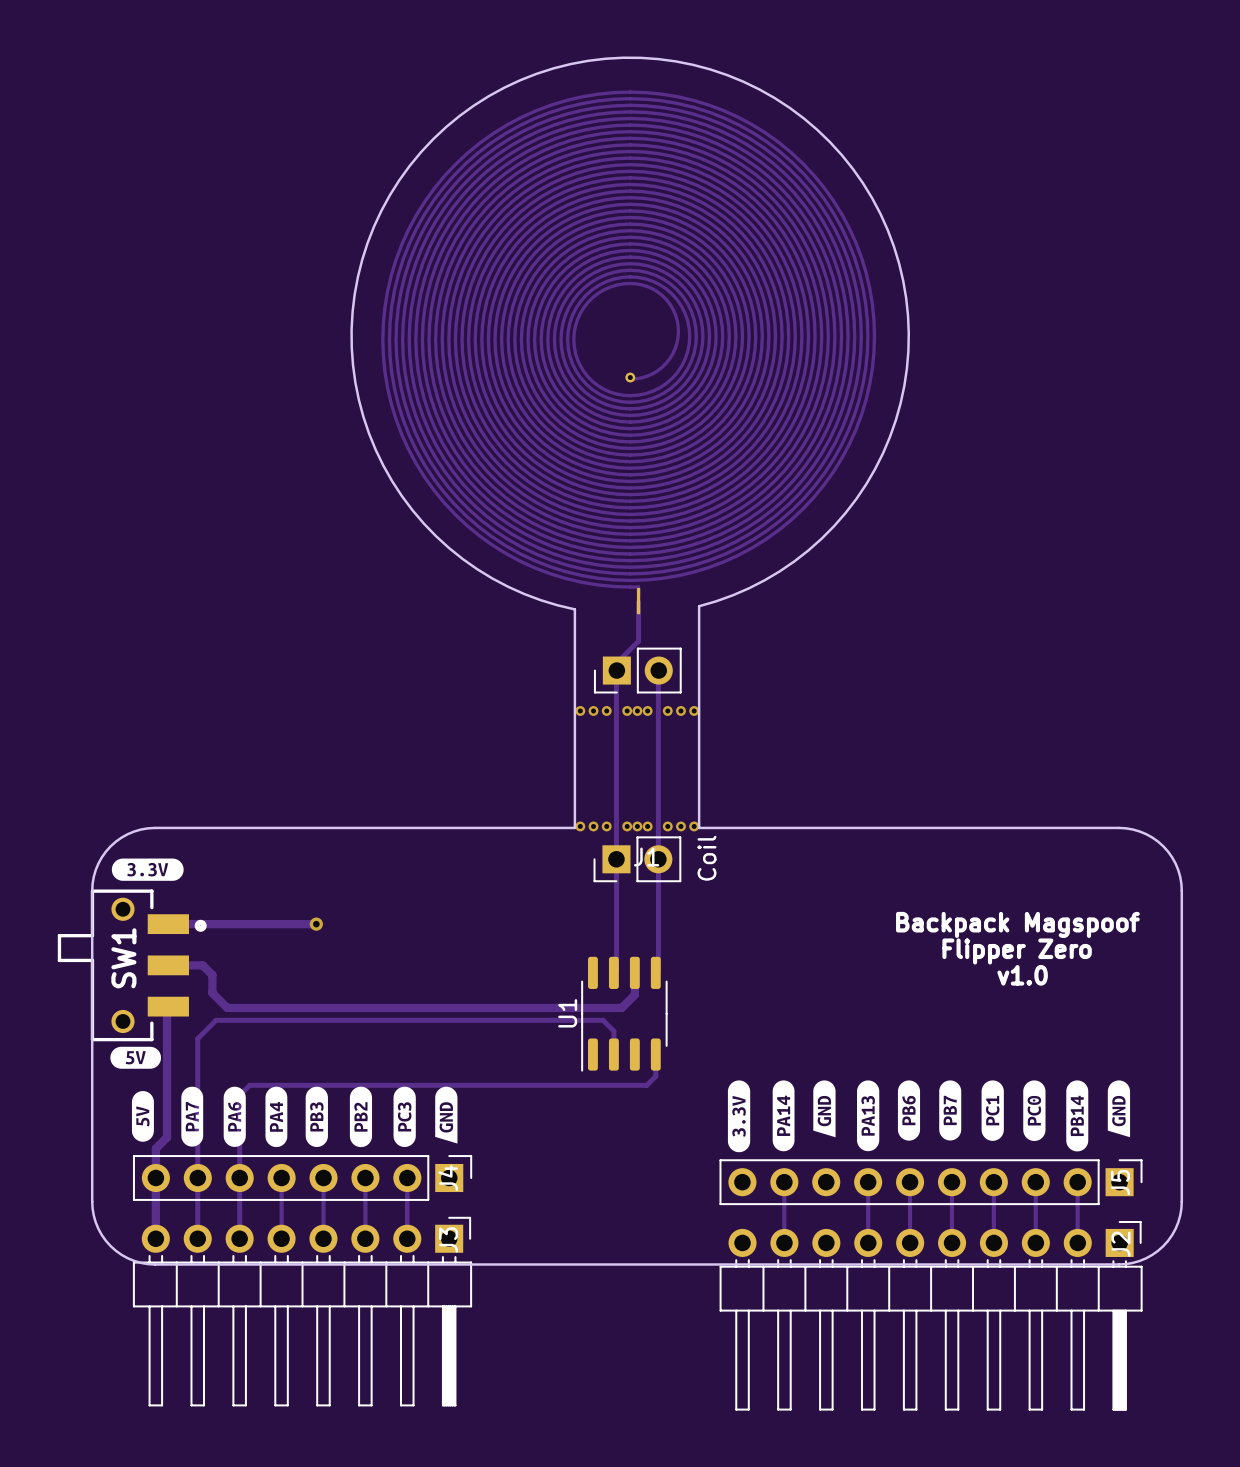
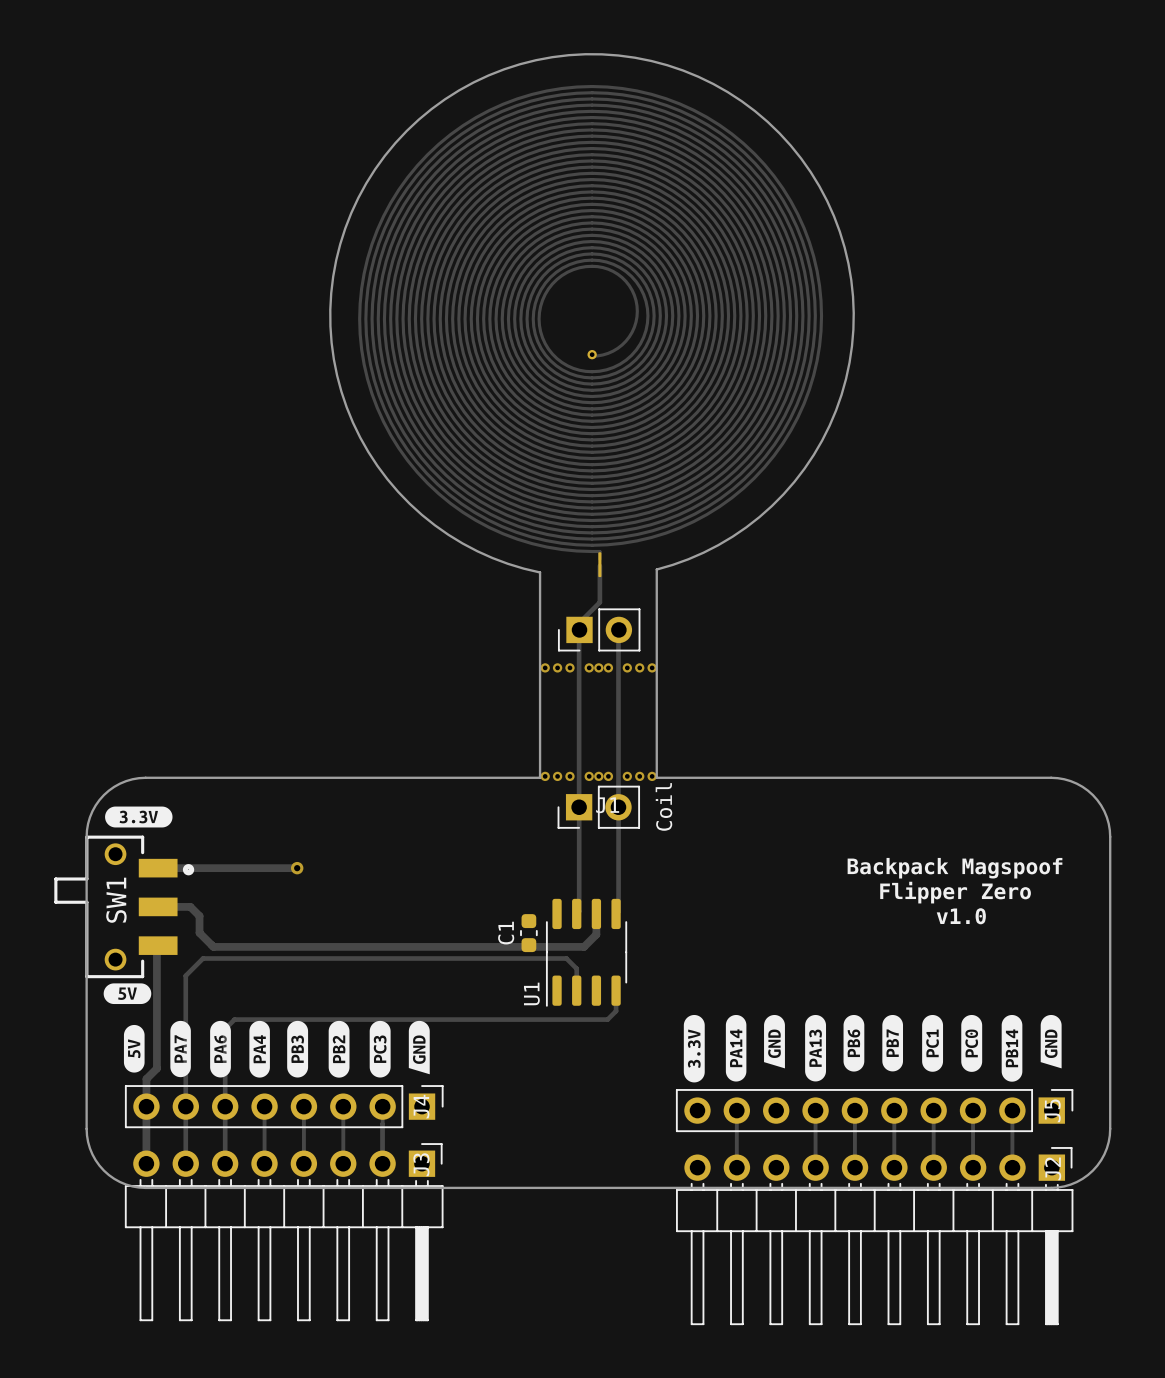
C1: none -> (528, 933)
U1 name position: U1 (567, 1013) -> U1 (531, 993)

